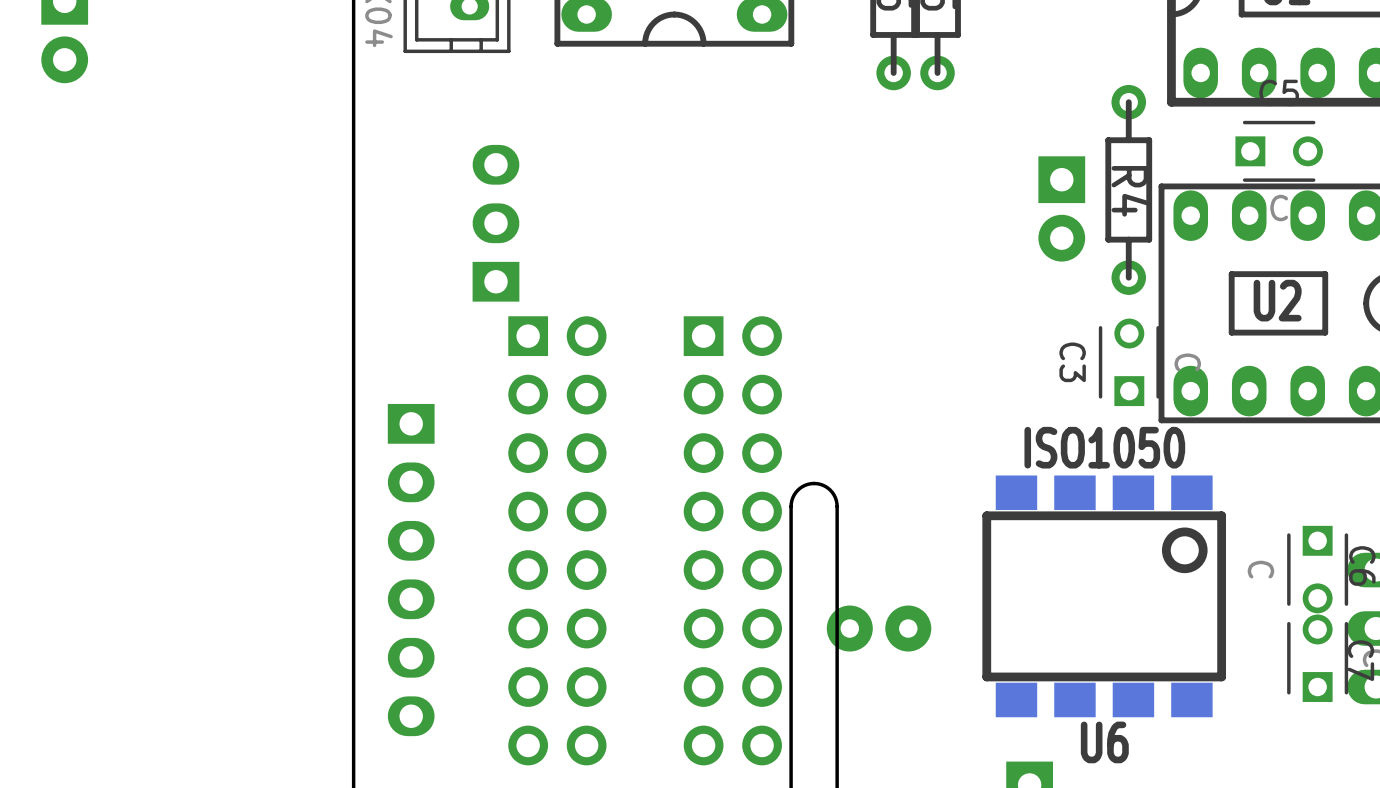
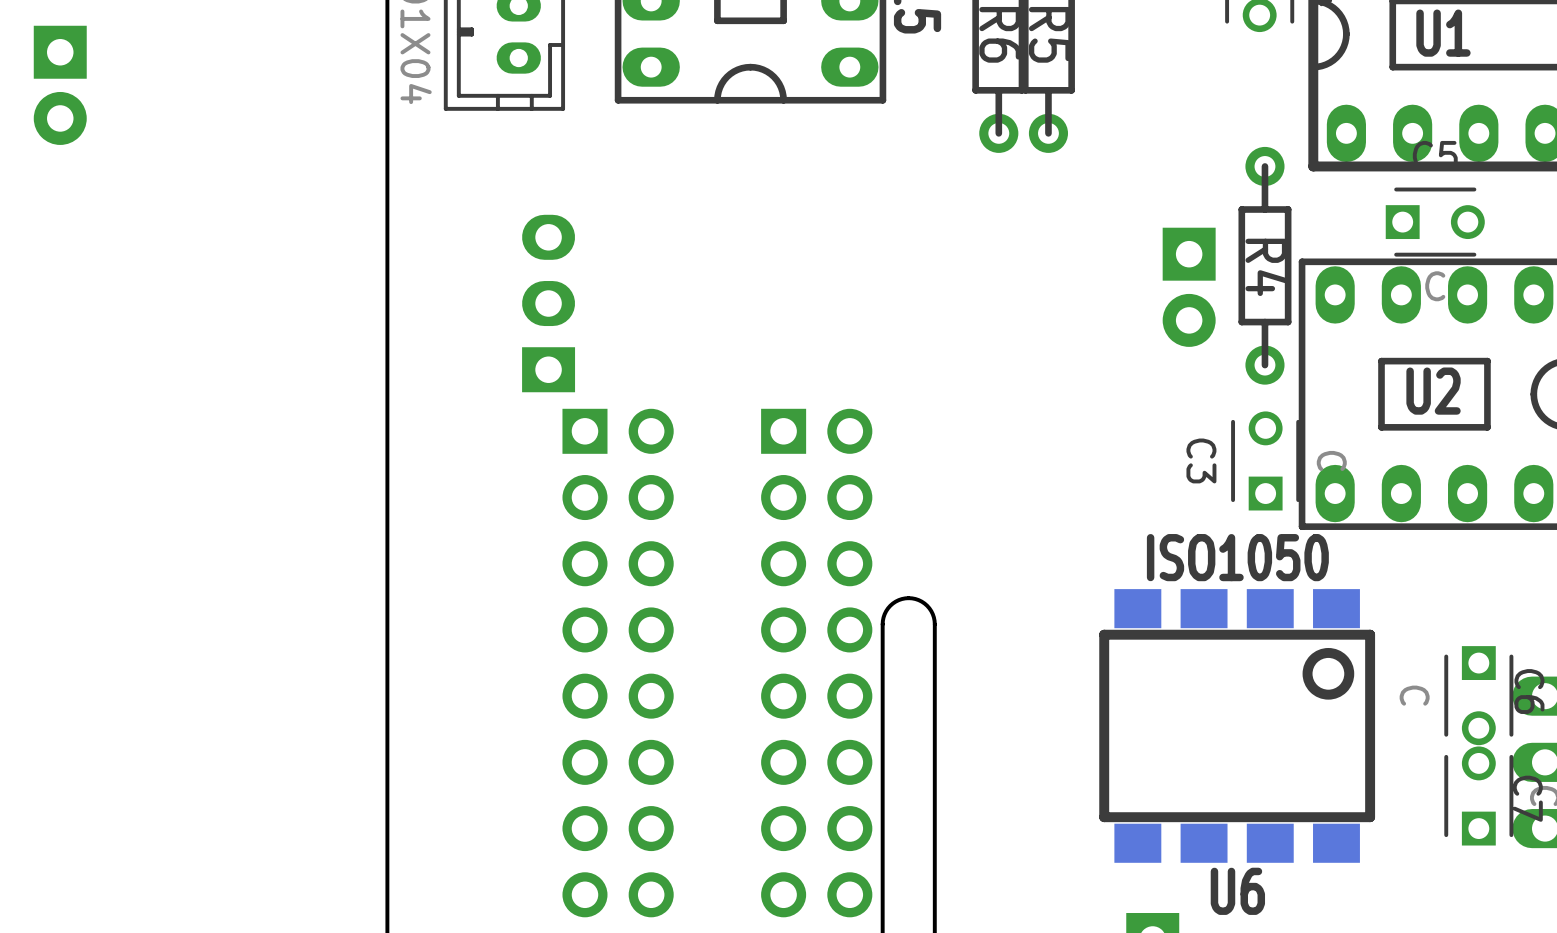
part: (411, 570) -> none
part: (879, 628) -> none

